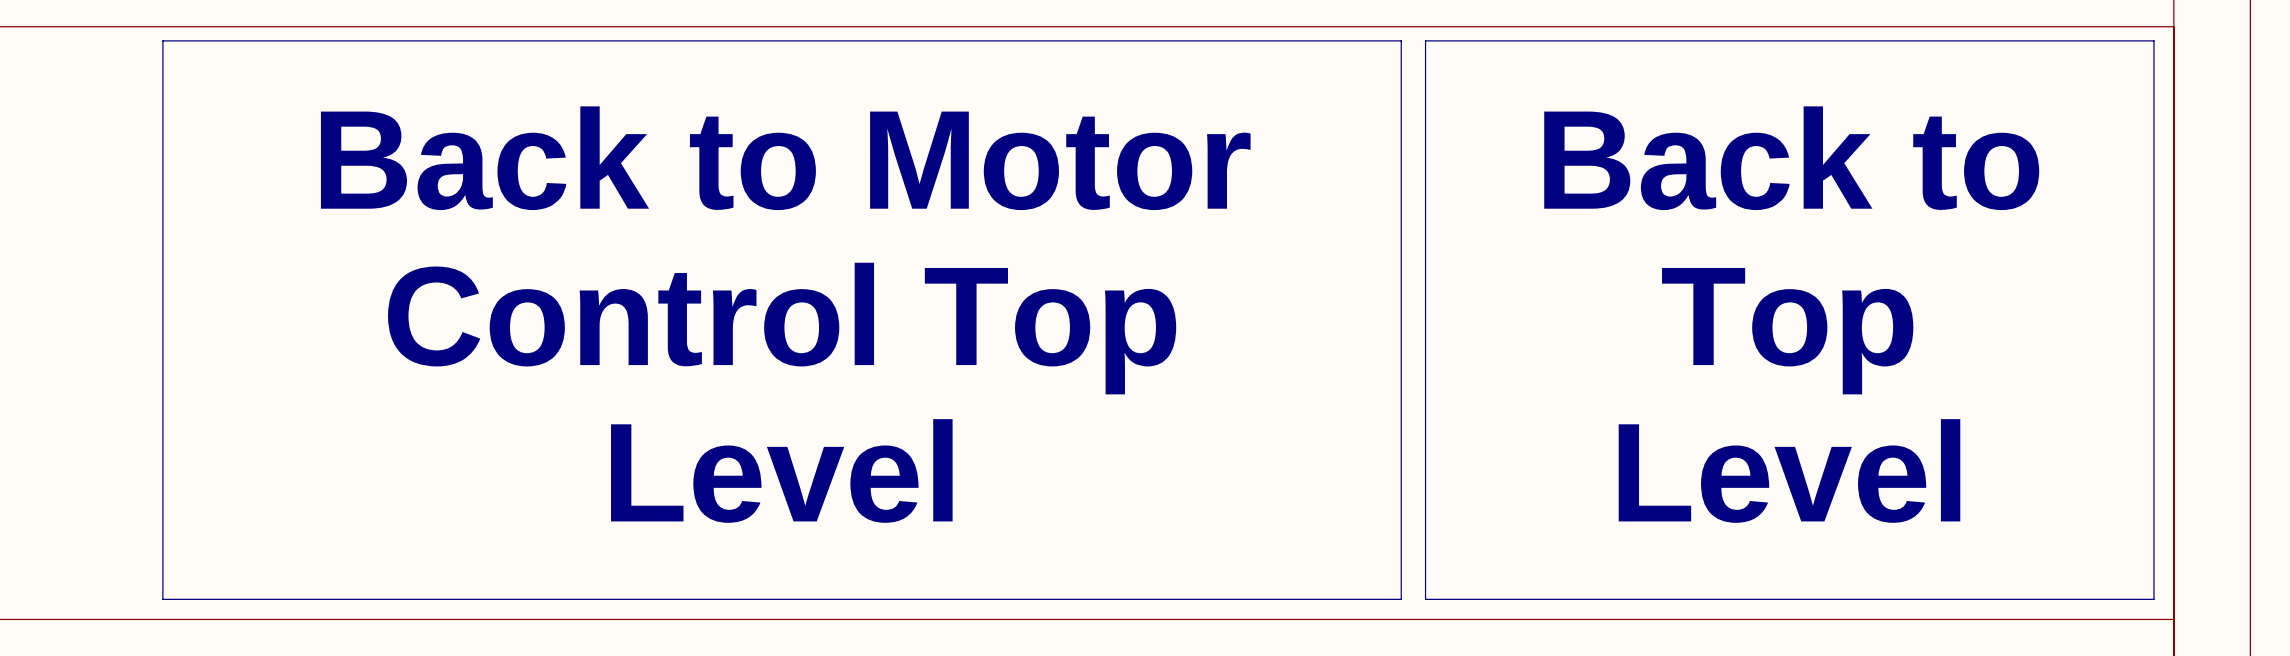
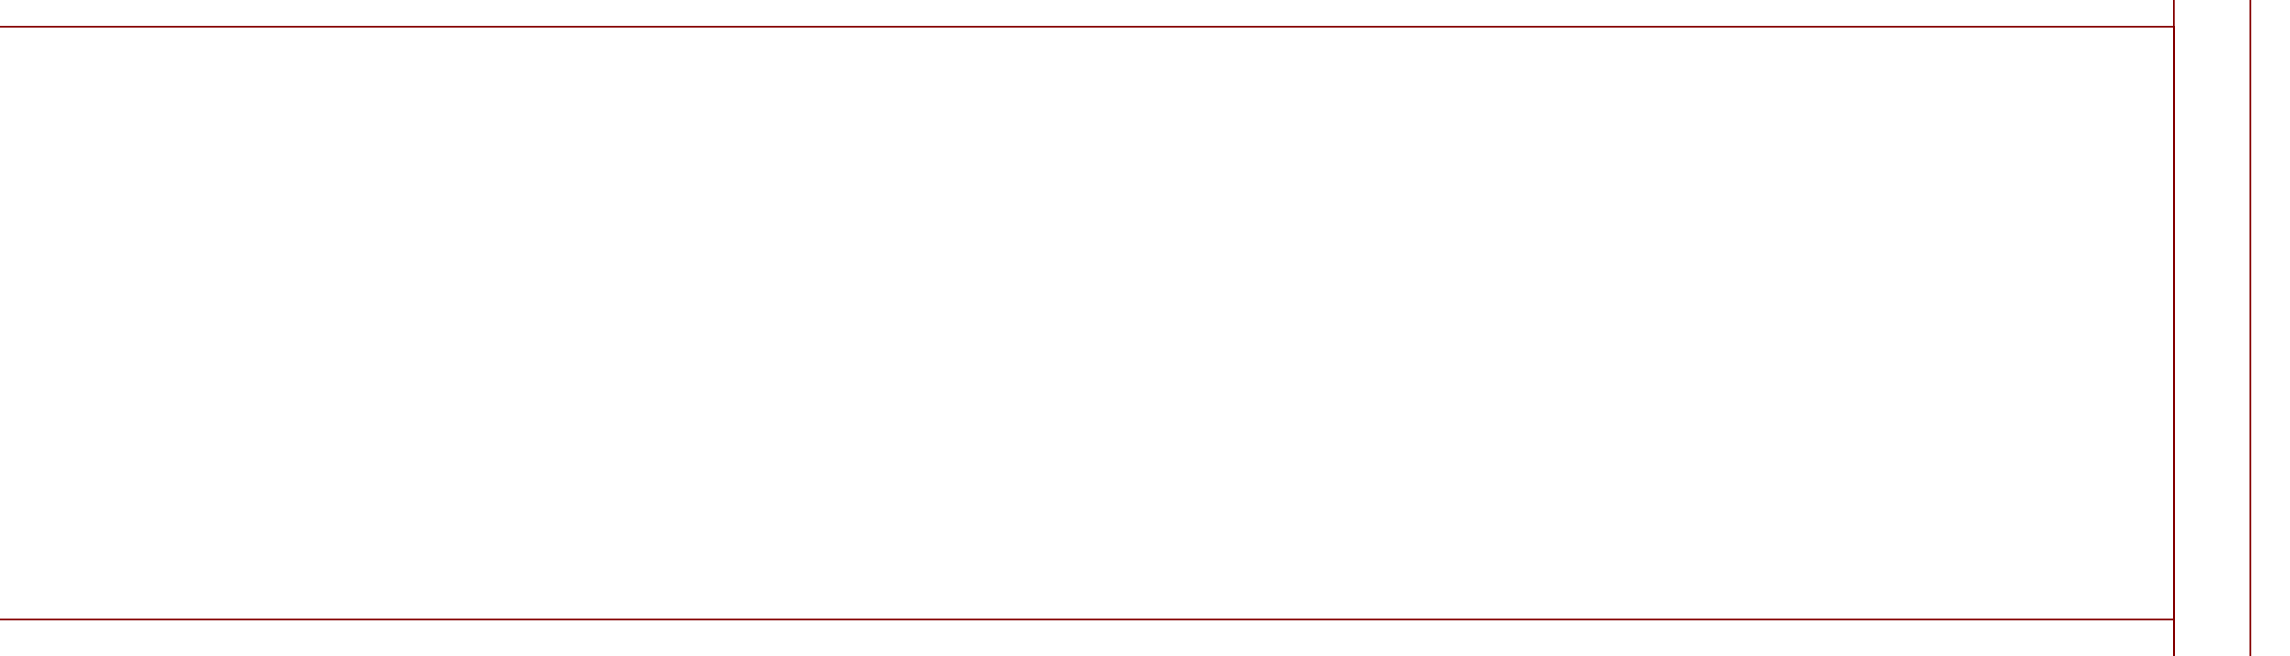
line: (162, 40) (1401, 40) (1401, 599) (162, 599) (162, 40) -> none
line: (1425, 40) (2153, 40) (2153, 599) (1425, 599) (1425, 40) -> none
text: Back to Motor (785, 158) -> none
text: Back to (1791, 158) -> none
text: Control Top (782, 328) -> none
text: Top (1787, 331) -> none
text: Level (781, 470) -> none
text: Level (1789, 470) -> none

